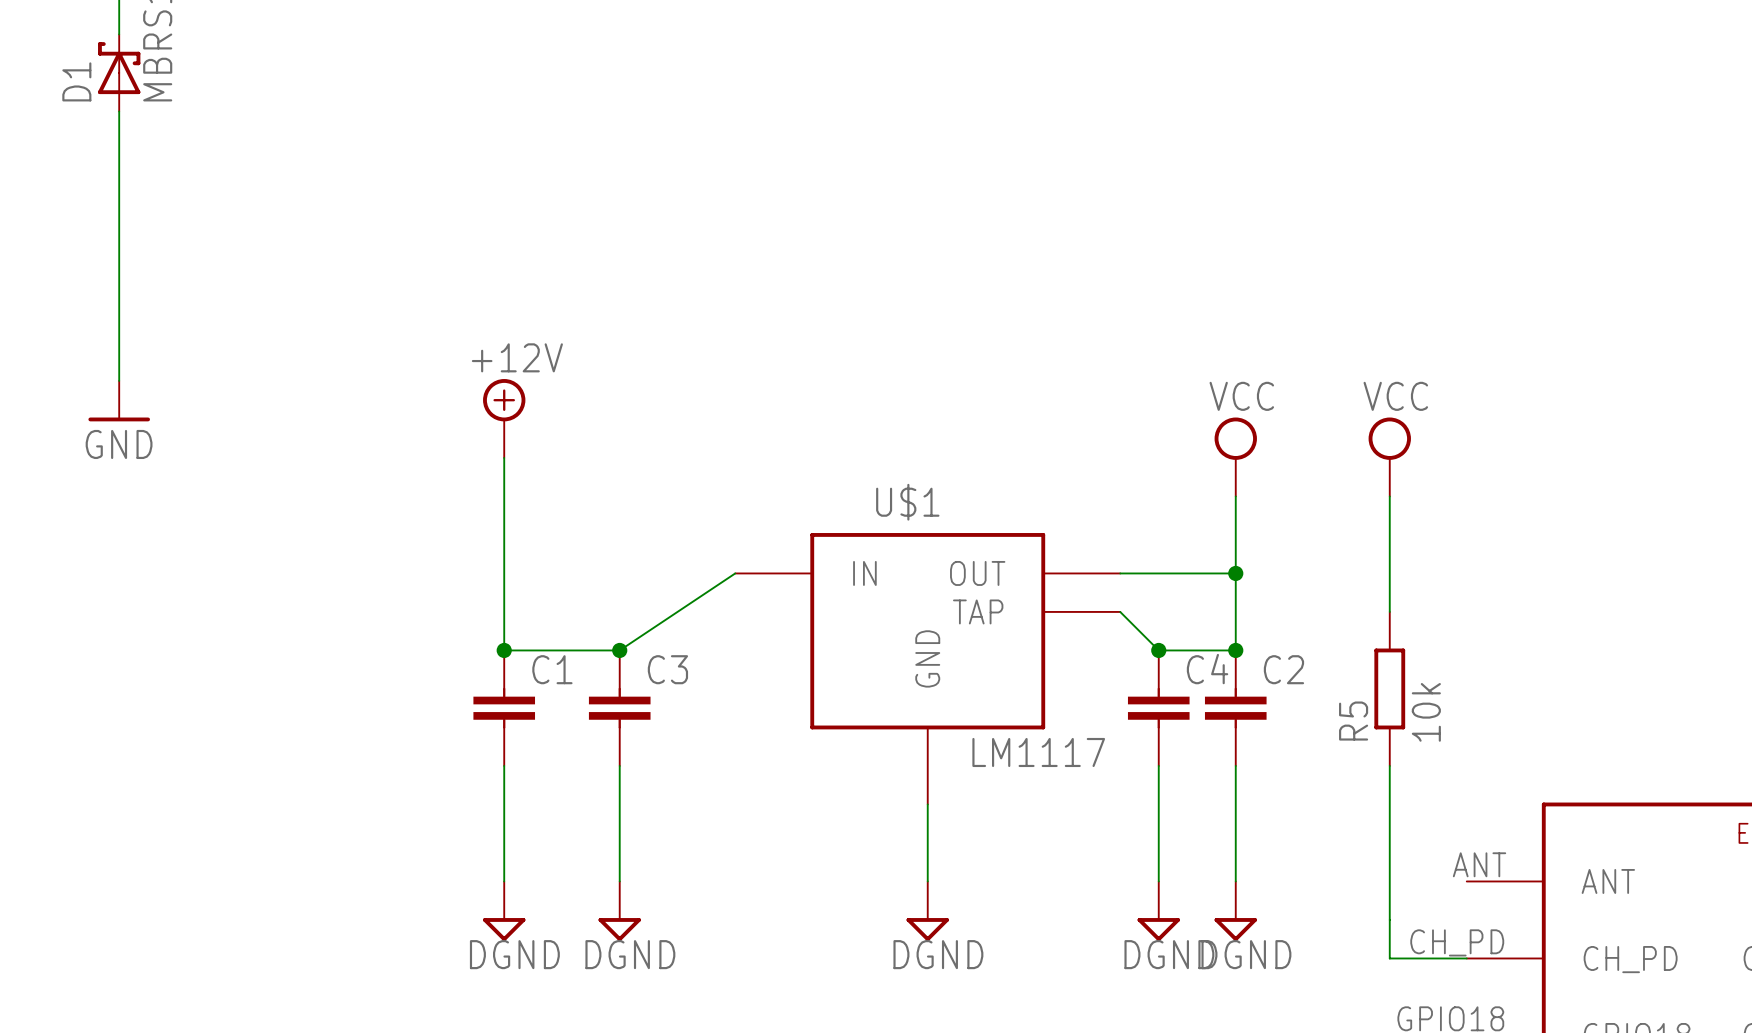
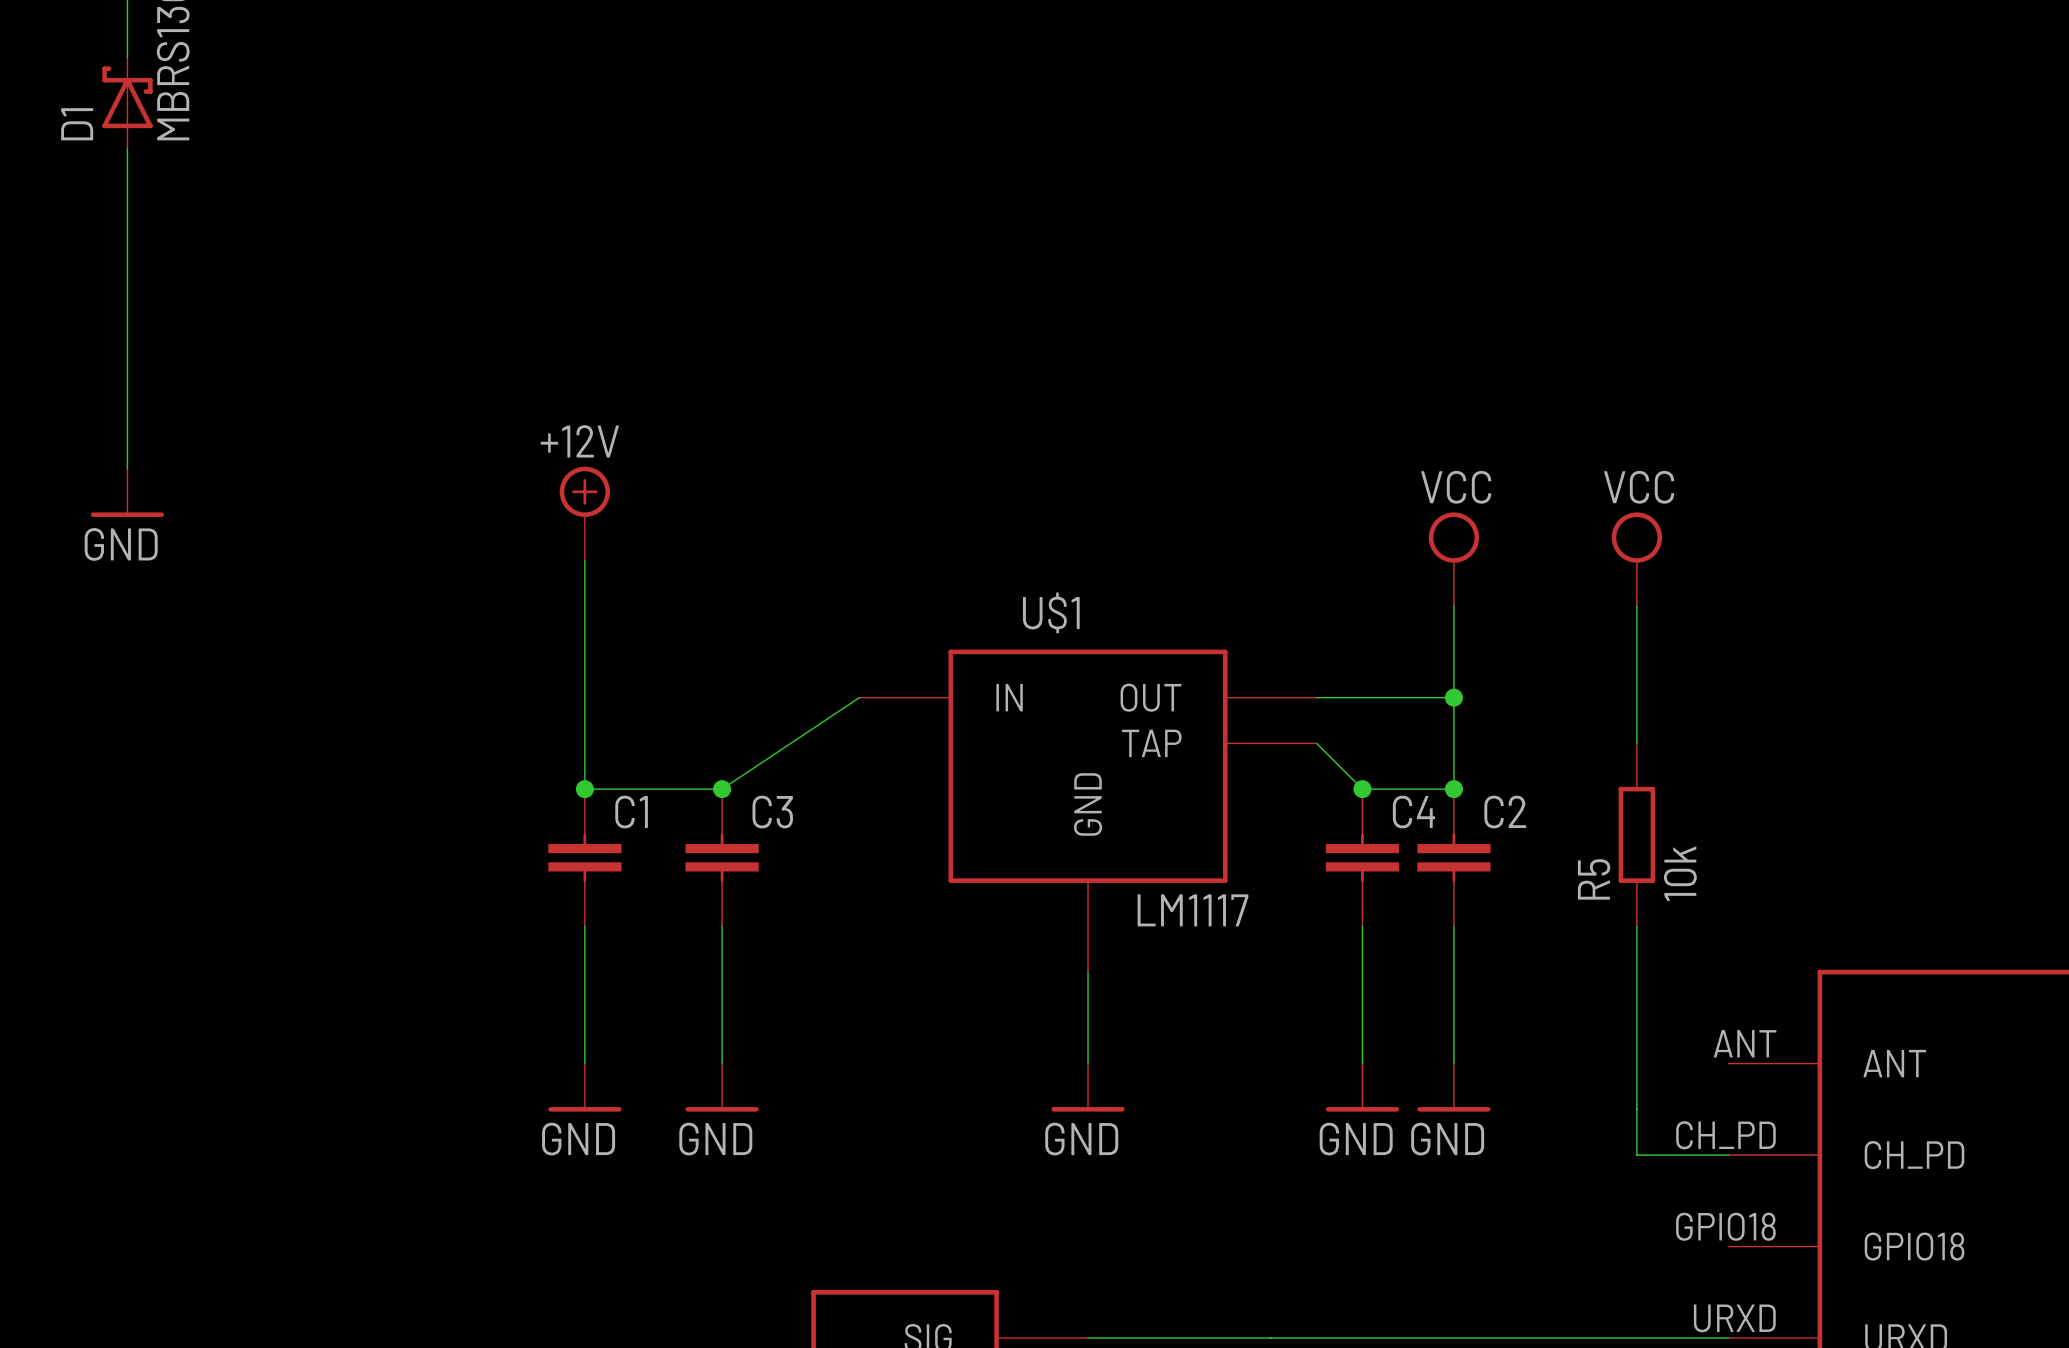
power symbol: DGND (504, 911) -> GND (584, 1087)
power symbol: DGND (619, 911) -> GND (722, 1087)
power symbol: DGND (927, 911) -> GND (1088, 1087)
power symbol: DGND (1158, 911) -> GND (1362, 1087)
power symbol: DGND (1235, 911) -> GND (1453, 1087)

